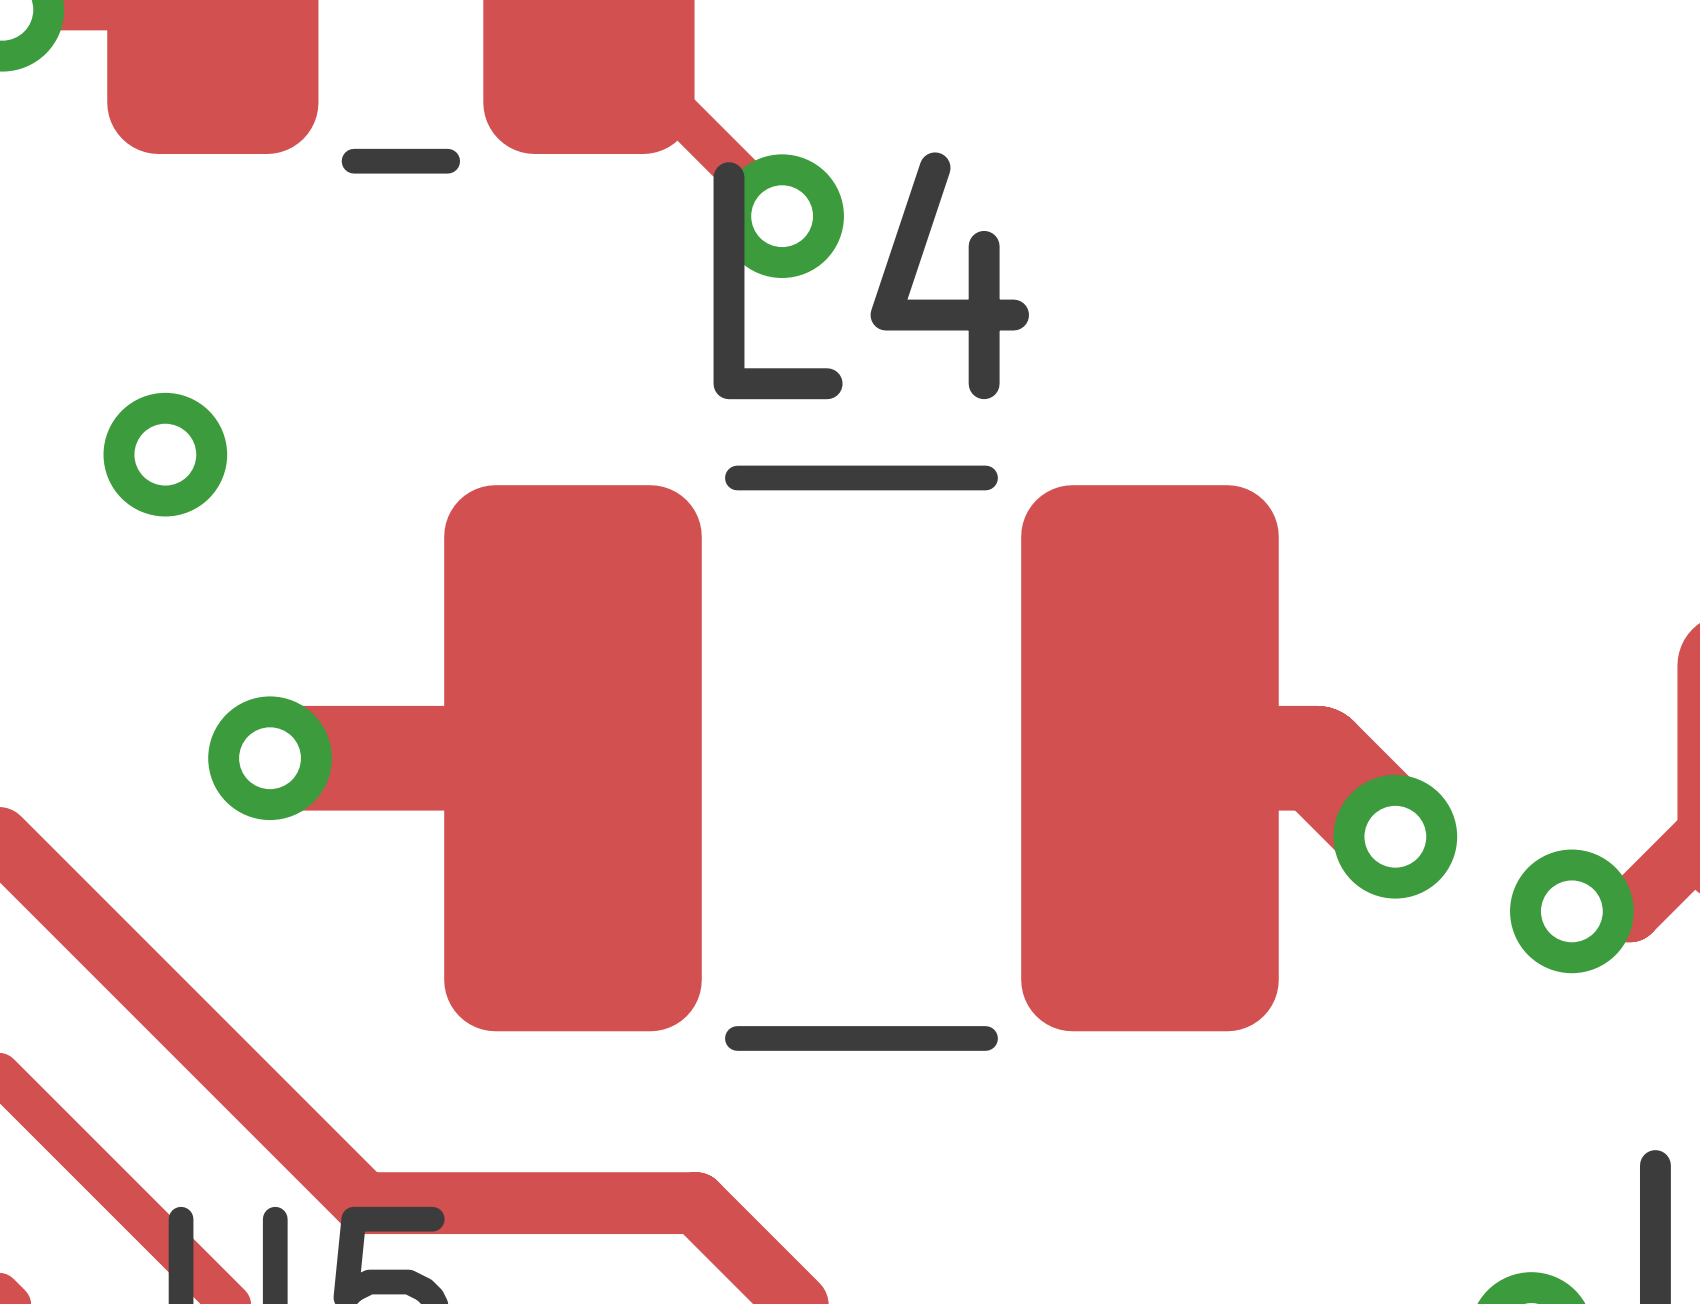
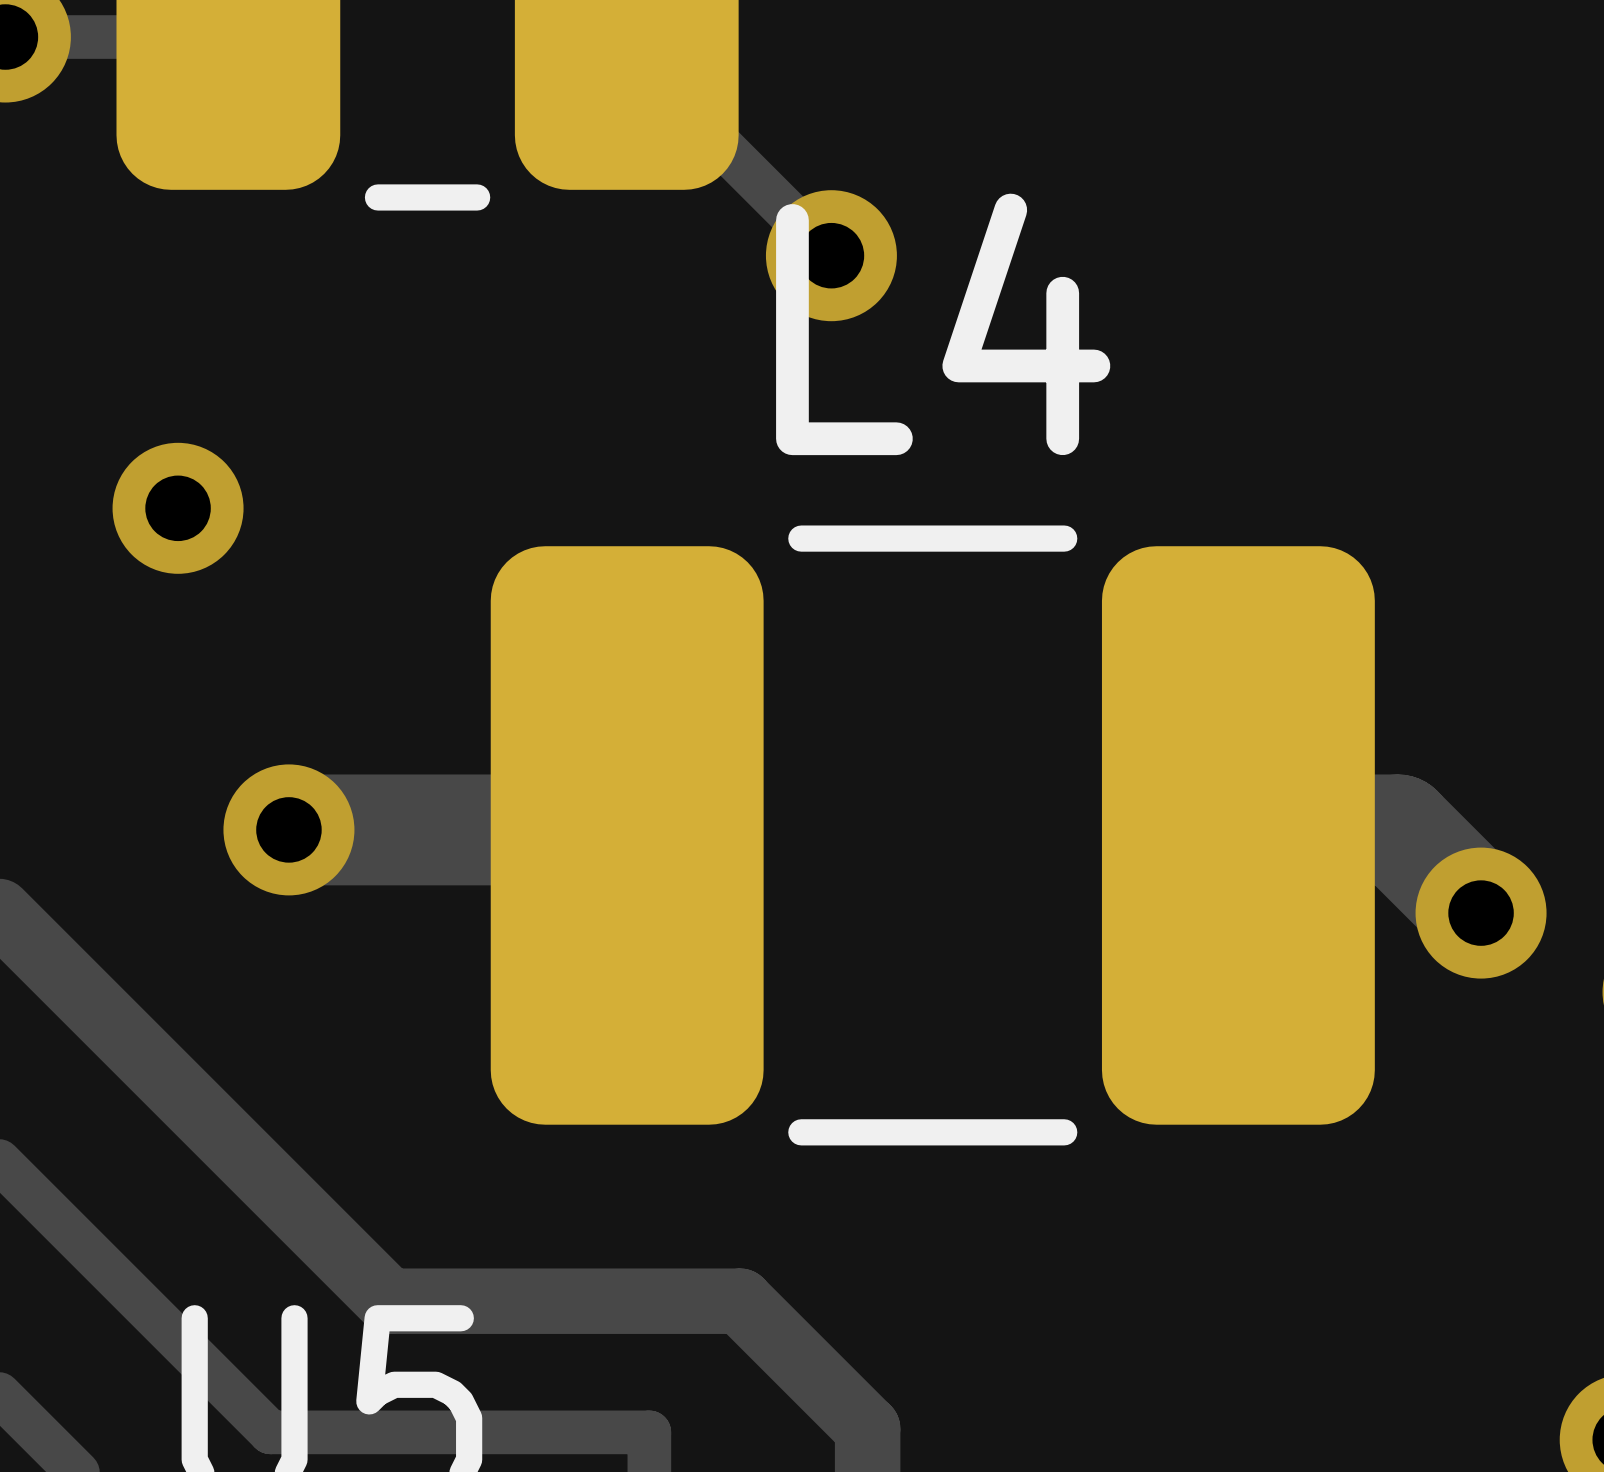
L4 position: (861, 758) -> (932, 835)

